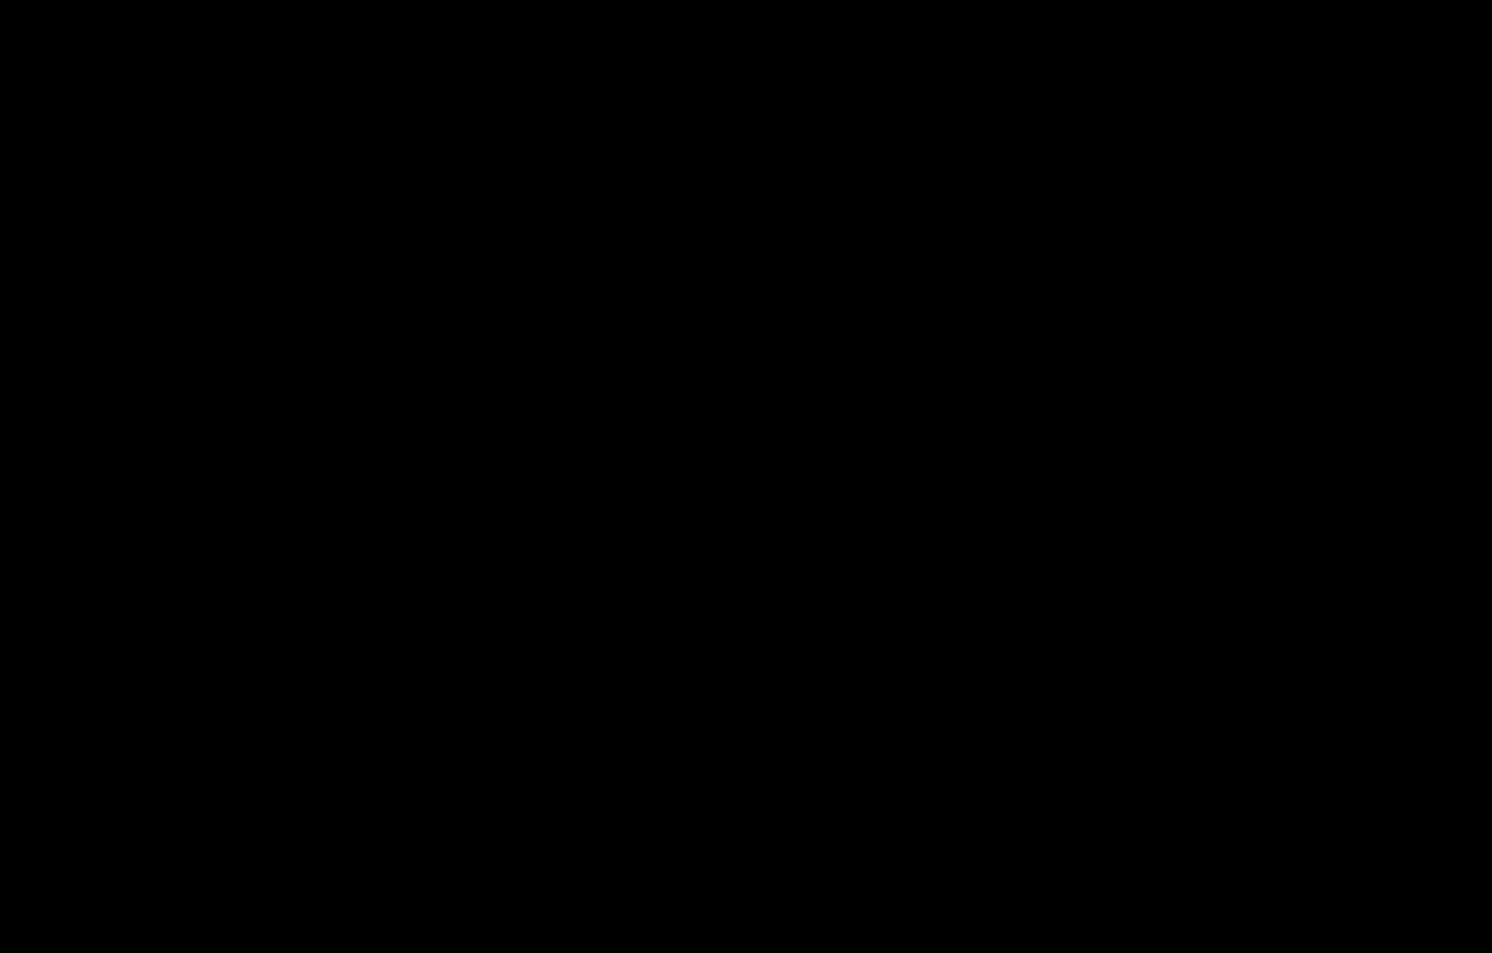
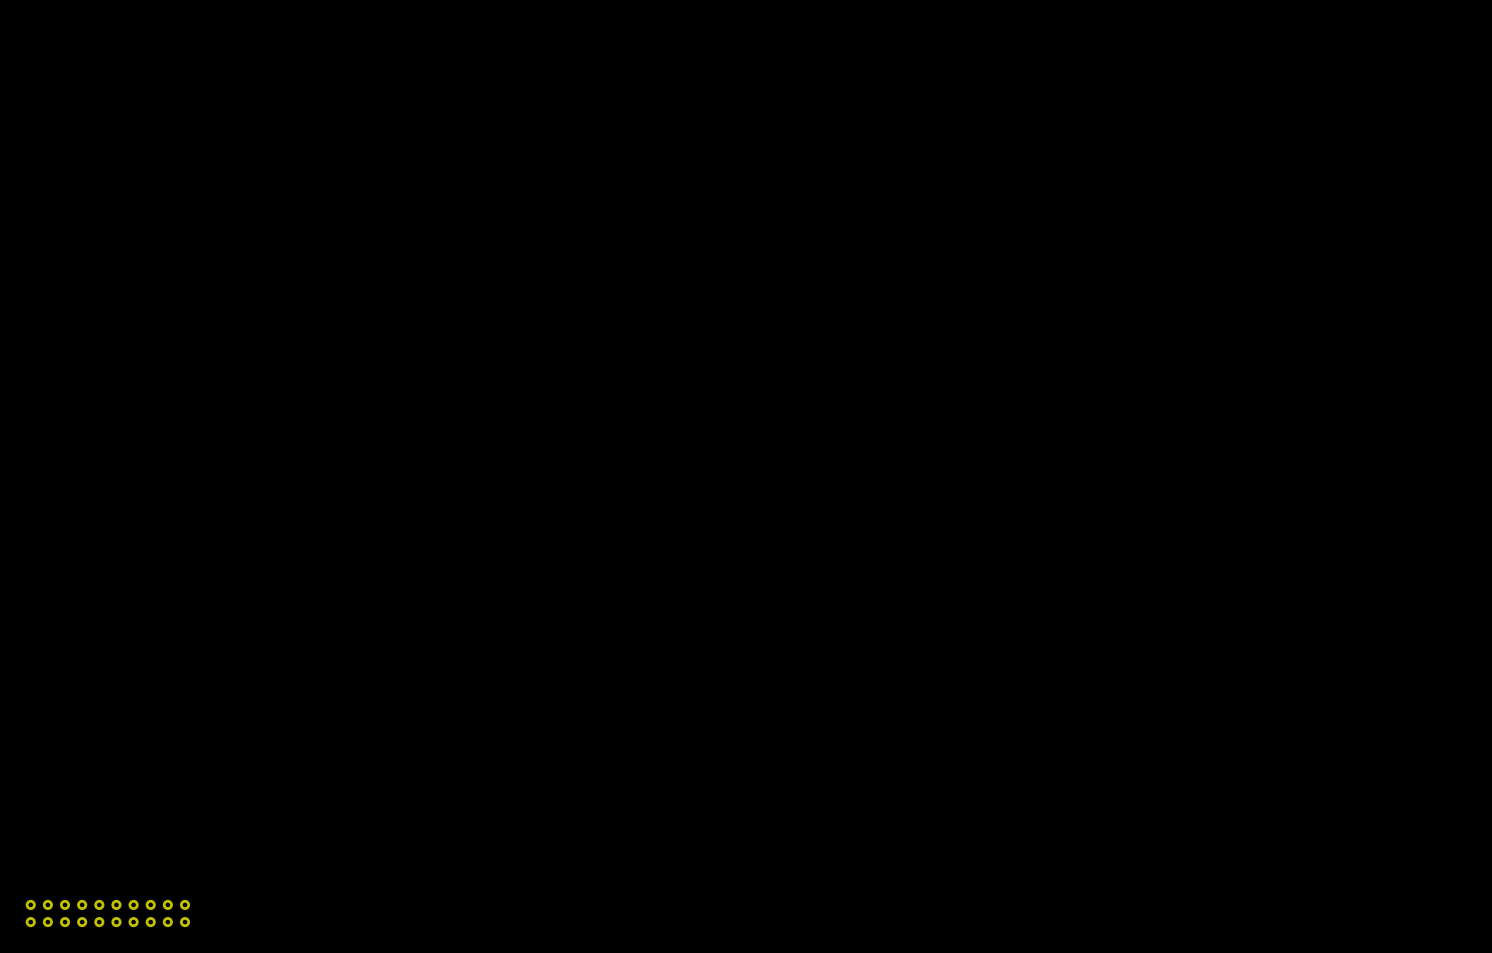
part: none -> (107, 913)

